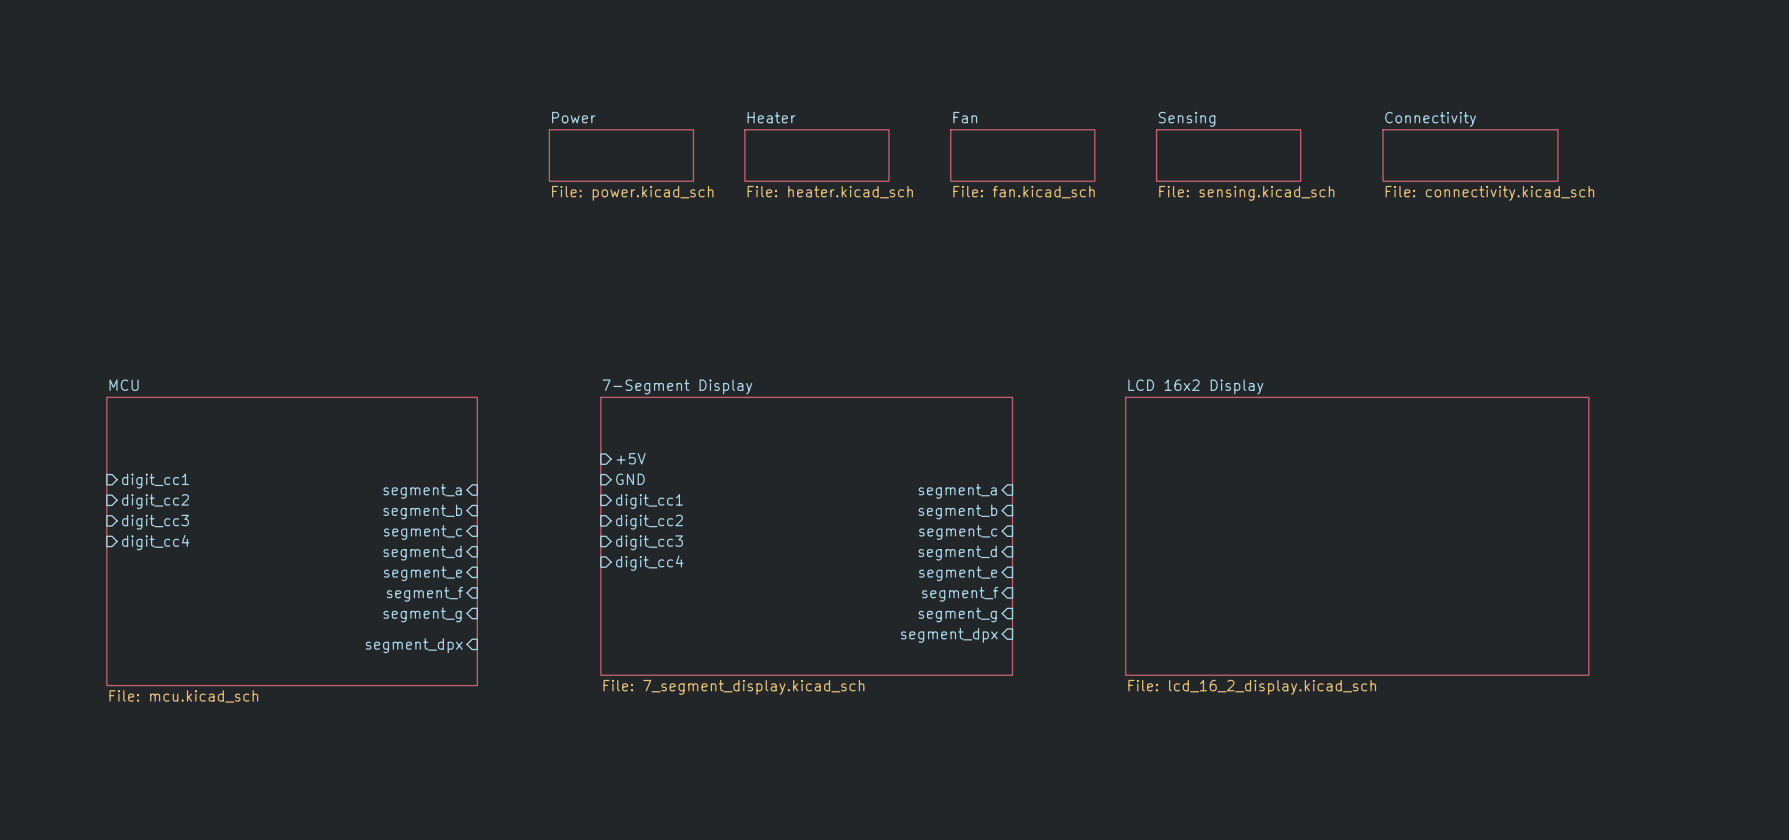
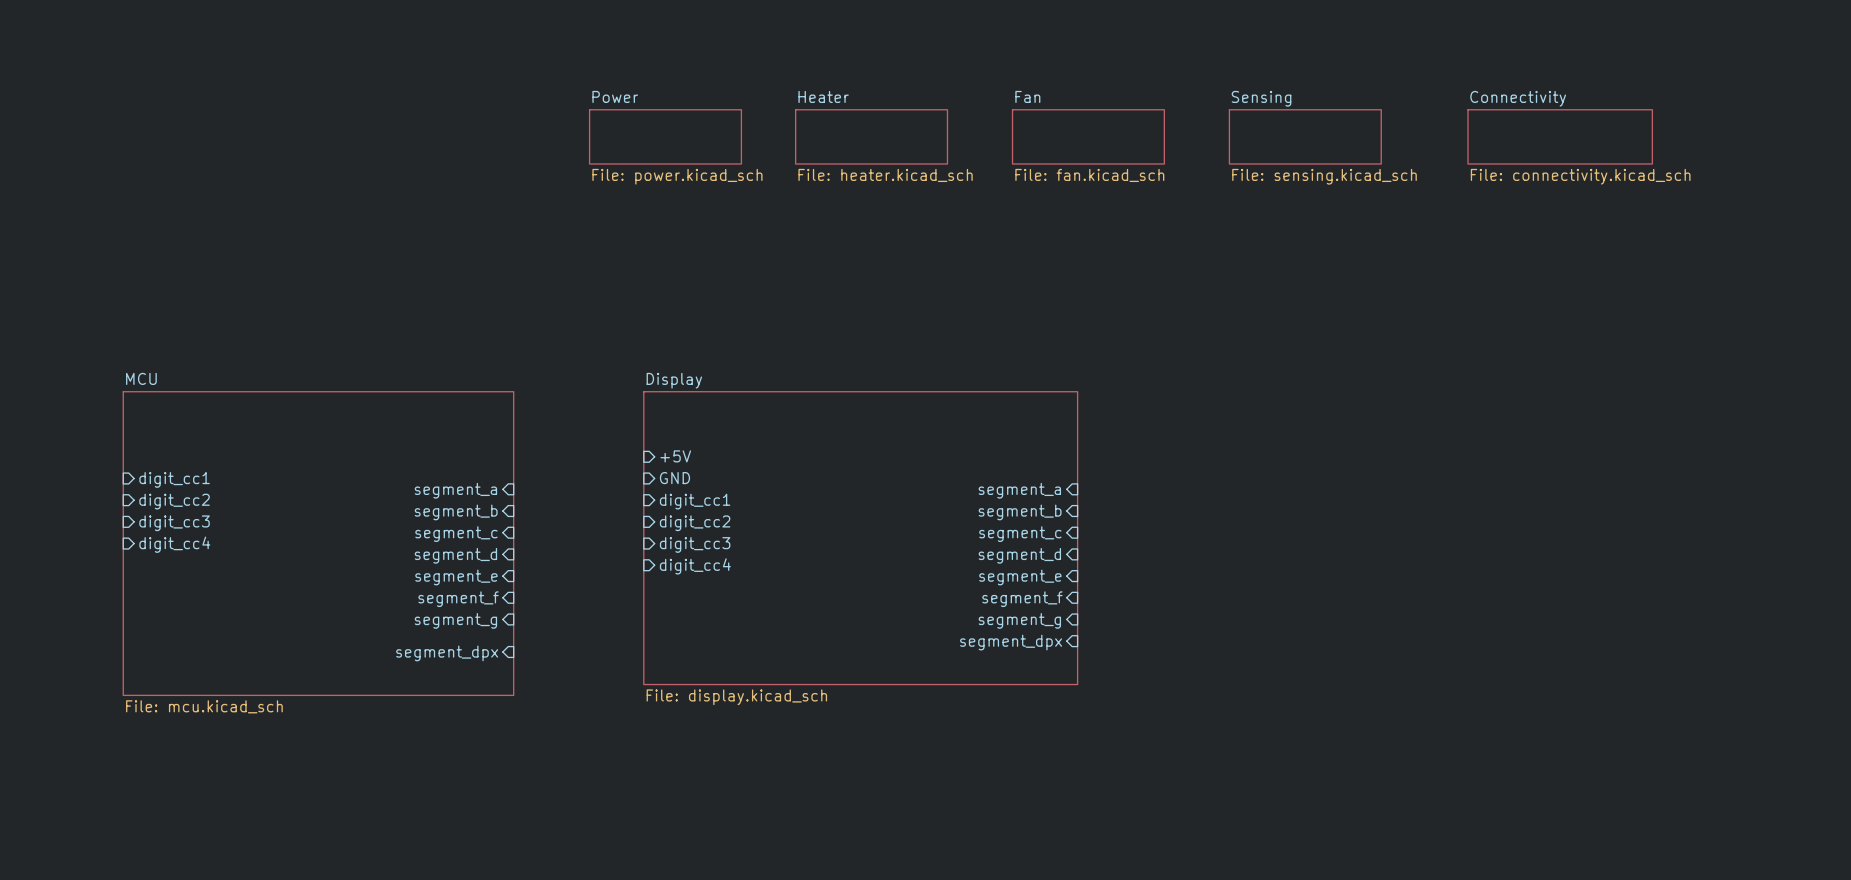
sheet 7-Segment Display name: 7-Segment Display (677, 386) -> Display (674, 380)
sheet LCD 16x2 Display: File: lcd_16_2_display.kicad_sch (1357, 536) -> none
sheet 7-Segment Display value: File: 7_segment_display.kicad_sch (733, 687) -> File: display.kicad_sch (736, 697)

